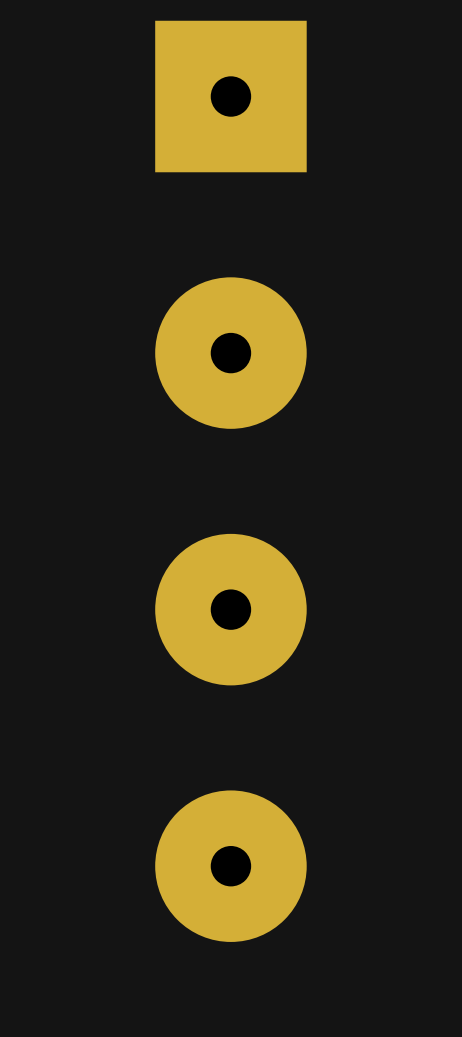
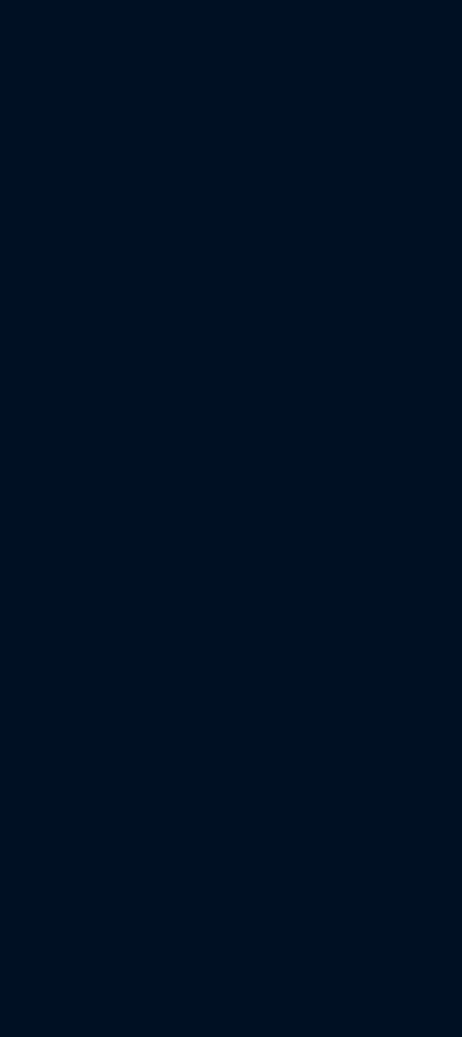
part: (230, 481) -> none

